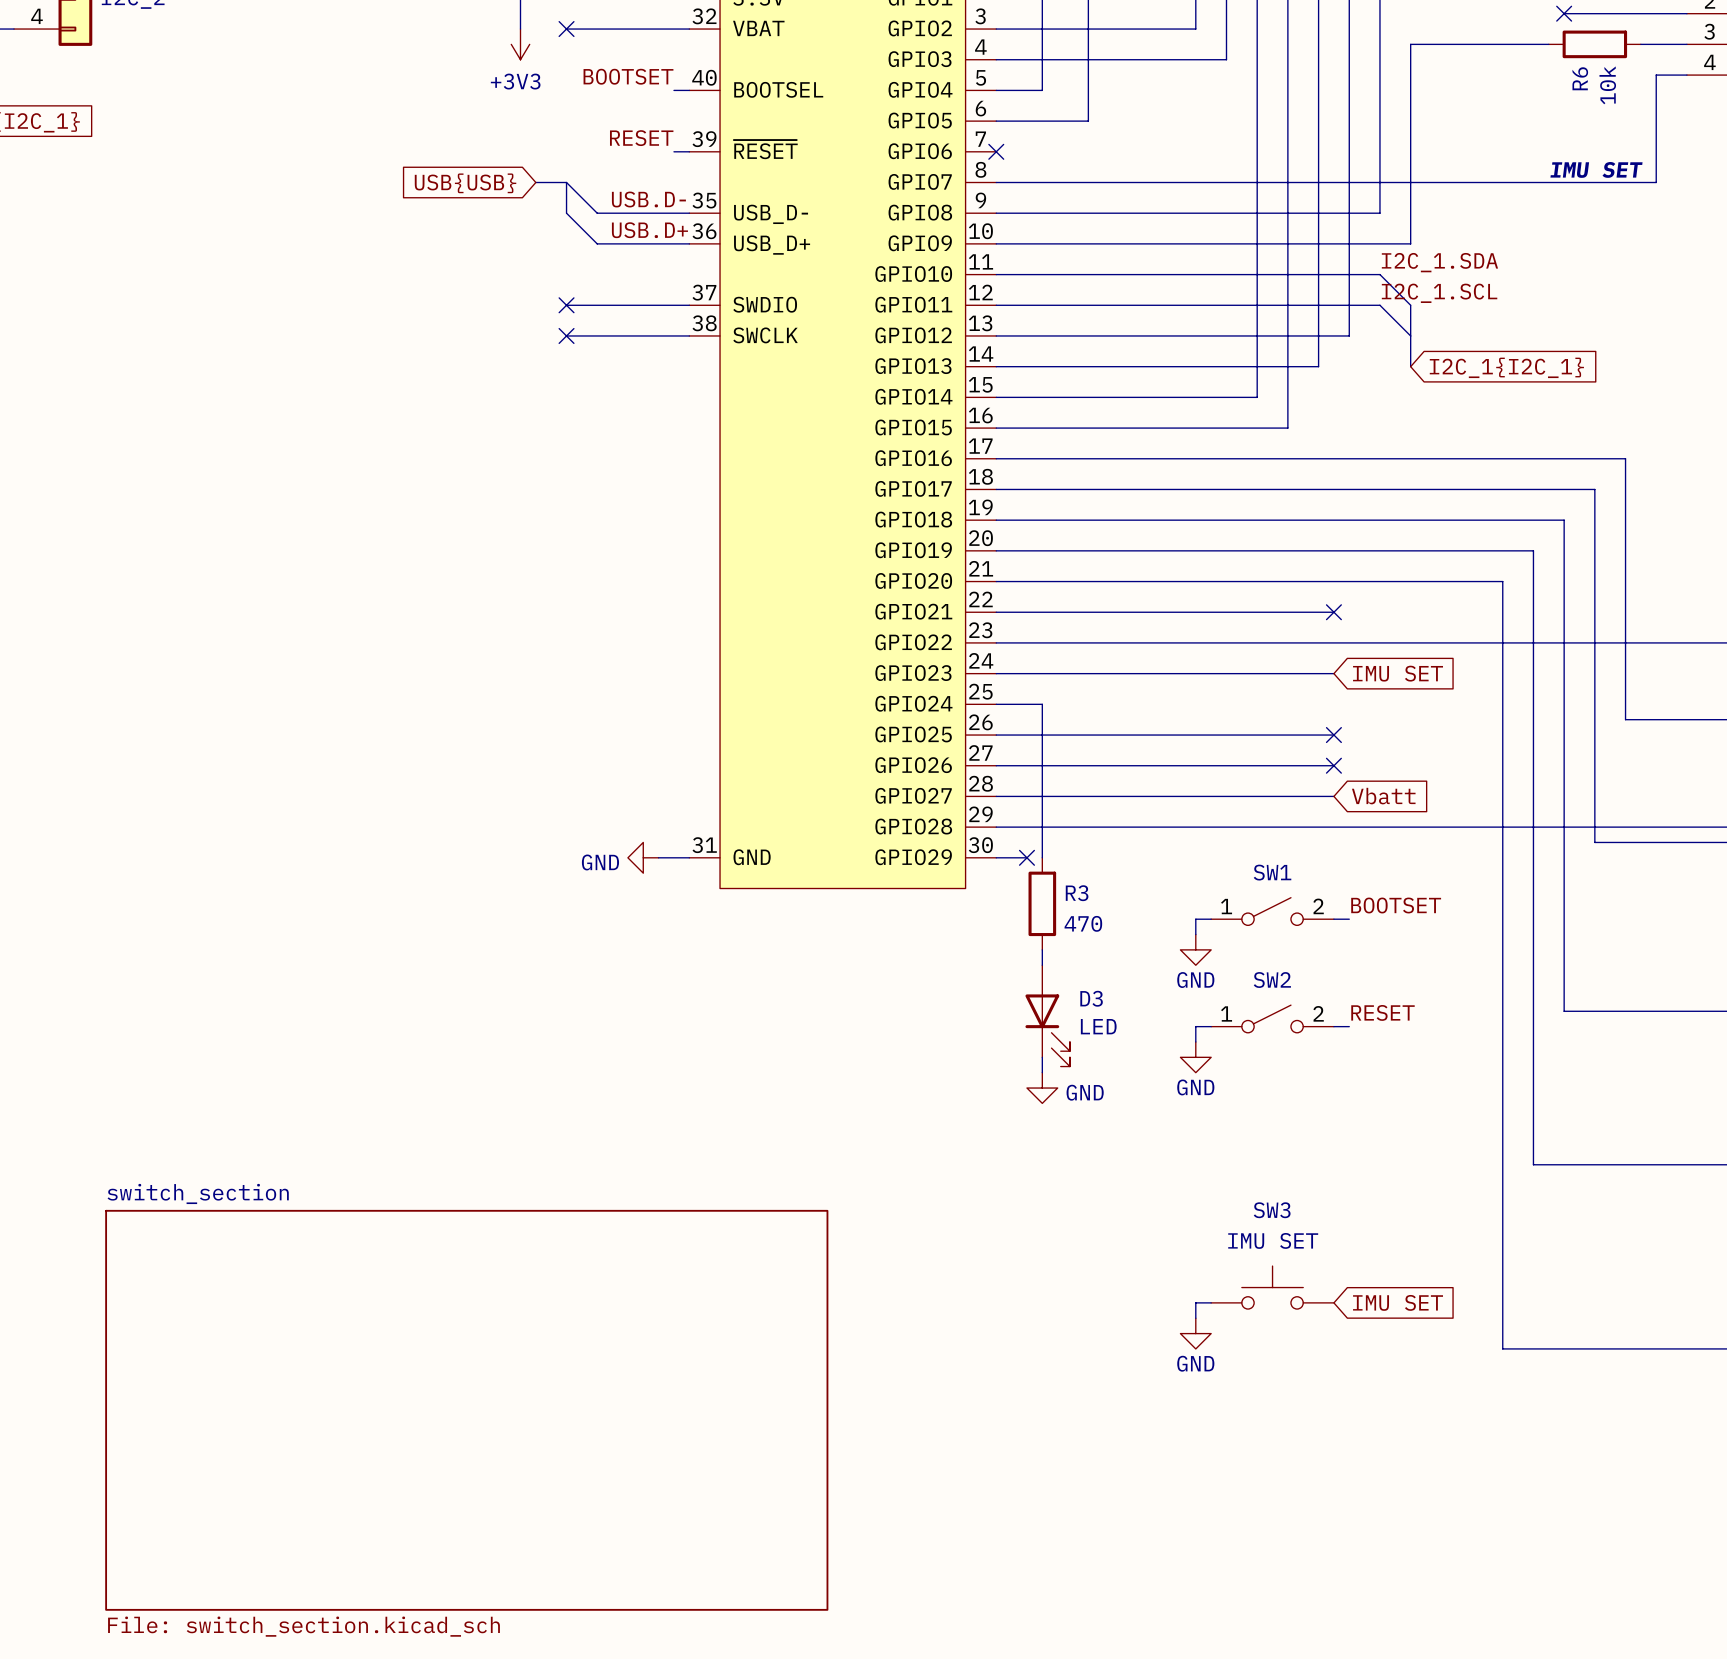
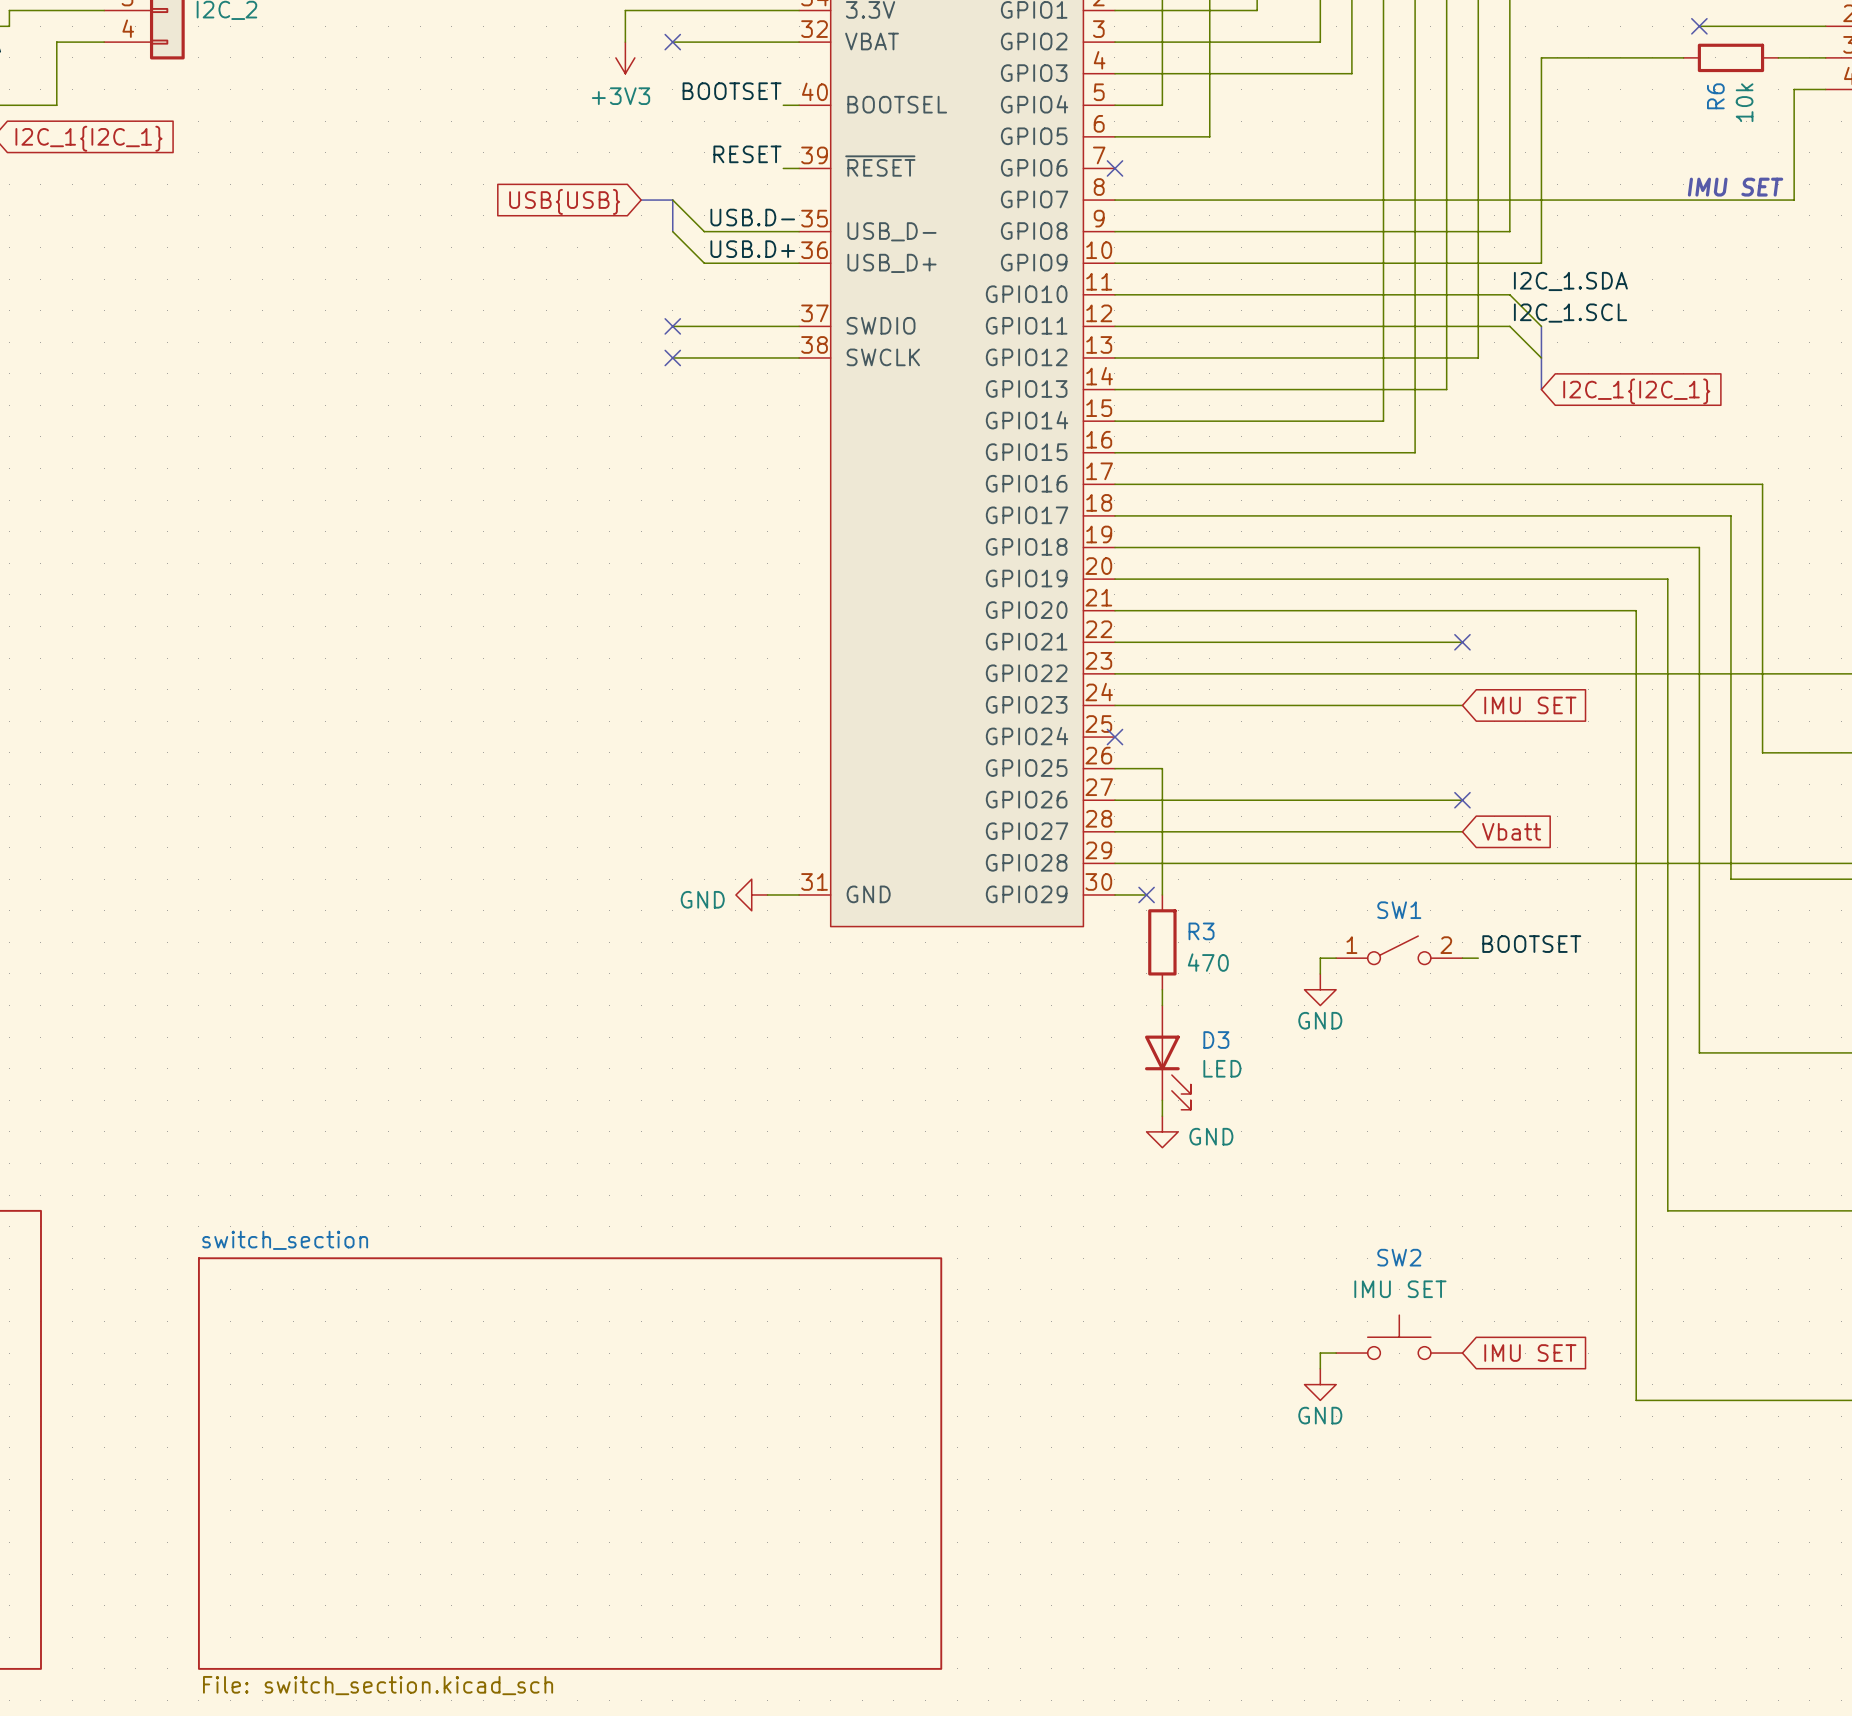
wire: (996, 704) (1042, 704) (1042, 735) (1333, 735) -> none
no-connect mark: none -> (1114, 737)
no-connect mark: (1333, 735) -> none
label: RESET (1382, 1012) -> none
SW2: (1272, 1018) -> none
wire: (1211, 1026) (1195, 1026) (1195, 1041) -> none
wire: (1333, 1026) (1349, 1026) -> none
power symbol: GND (1195, 1057) -> none
SW3 name: SW3 (1272, 1210) -> SW2 (1399, 1257)

